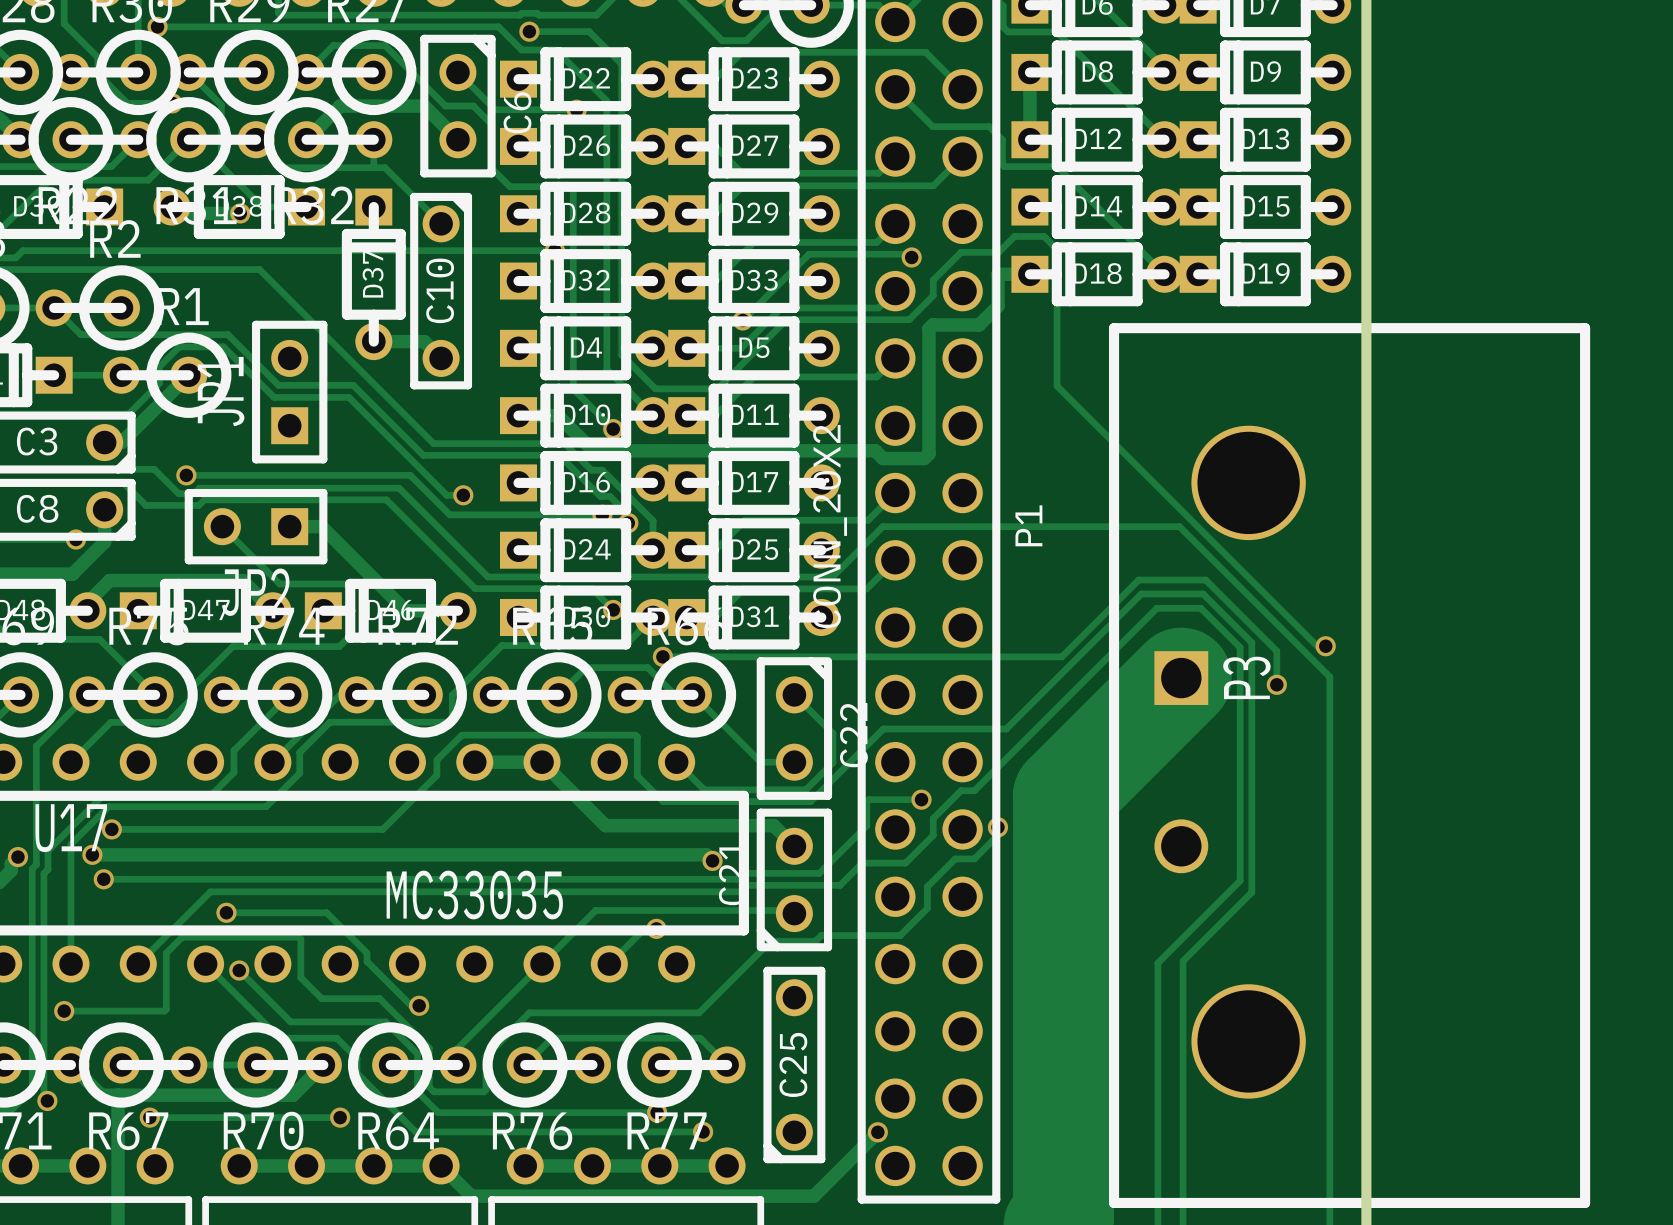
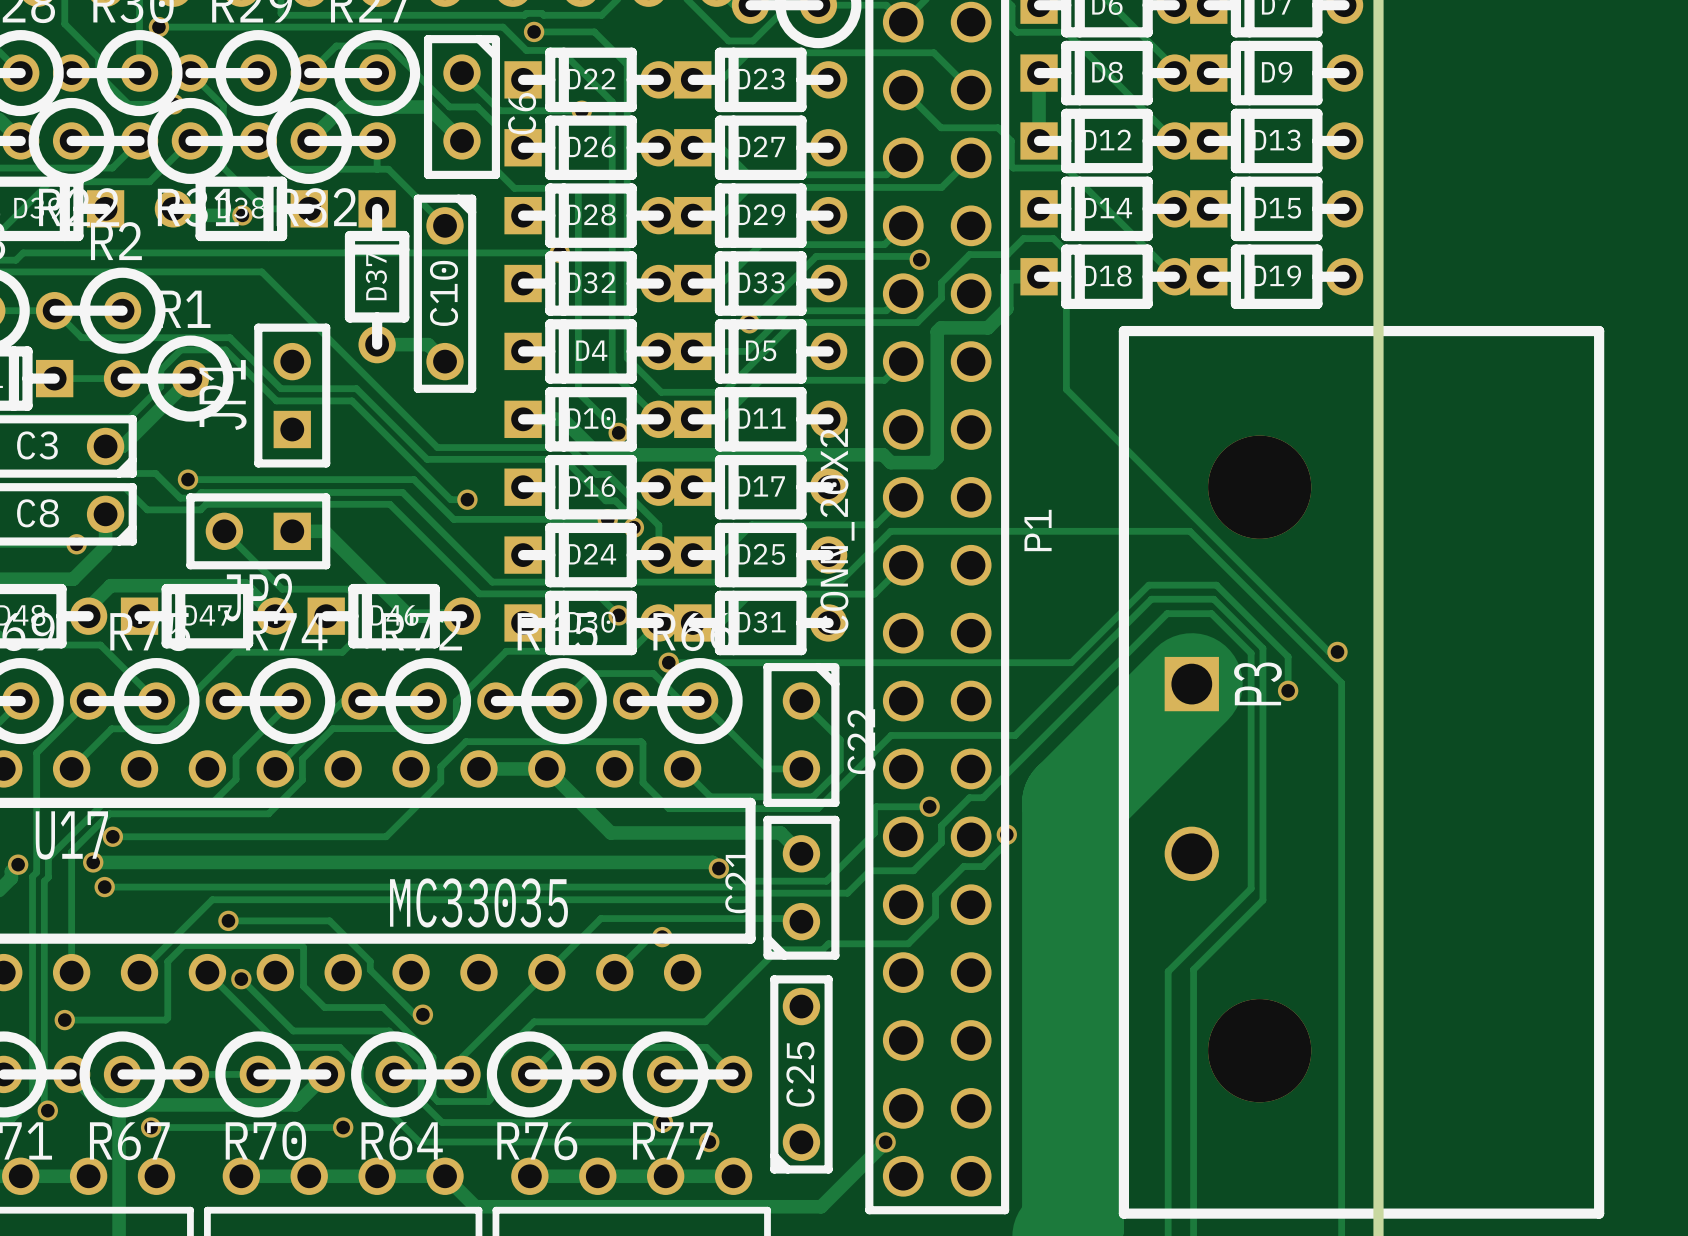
P3 footprint: [1108, 323, 1591, 1209] -> [1118, 325, 1605, 1219]

